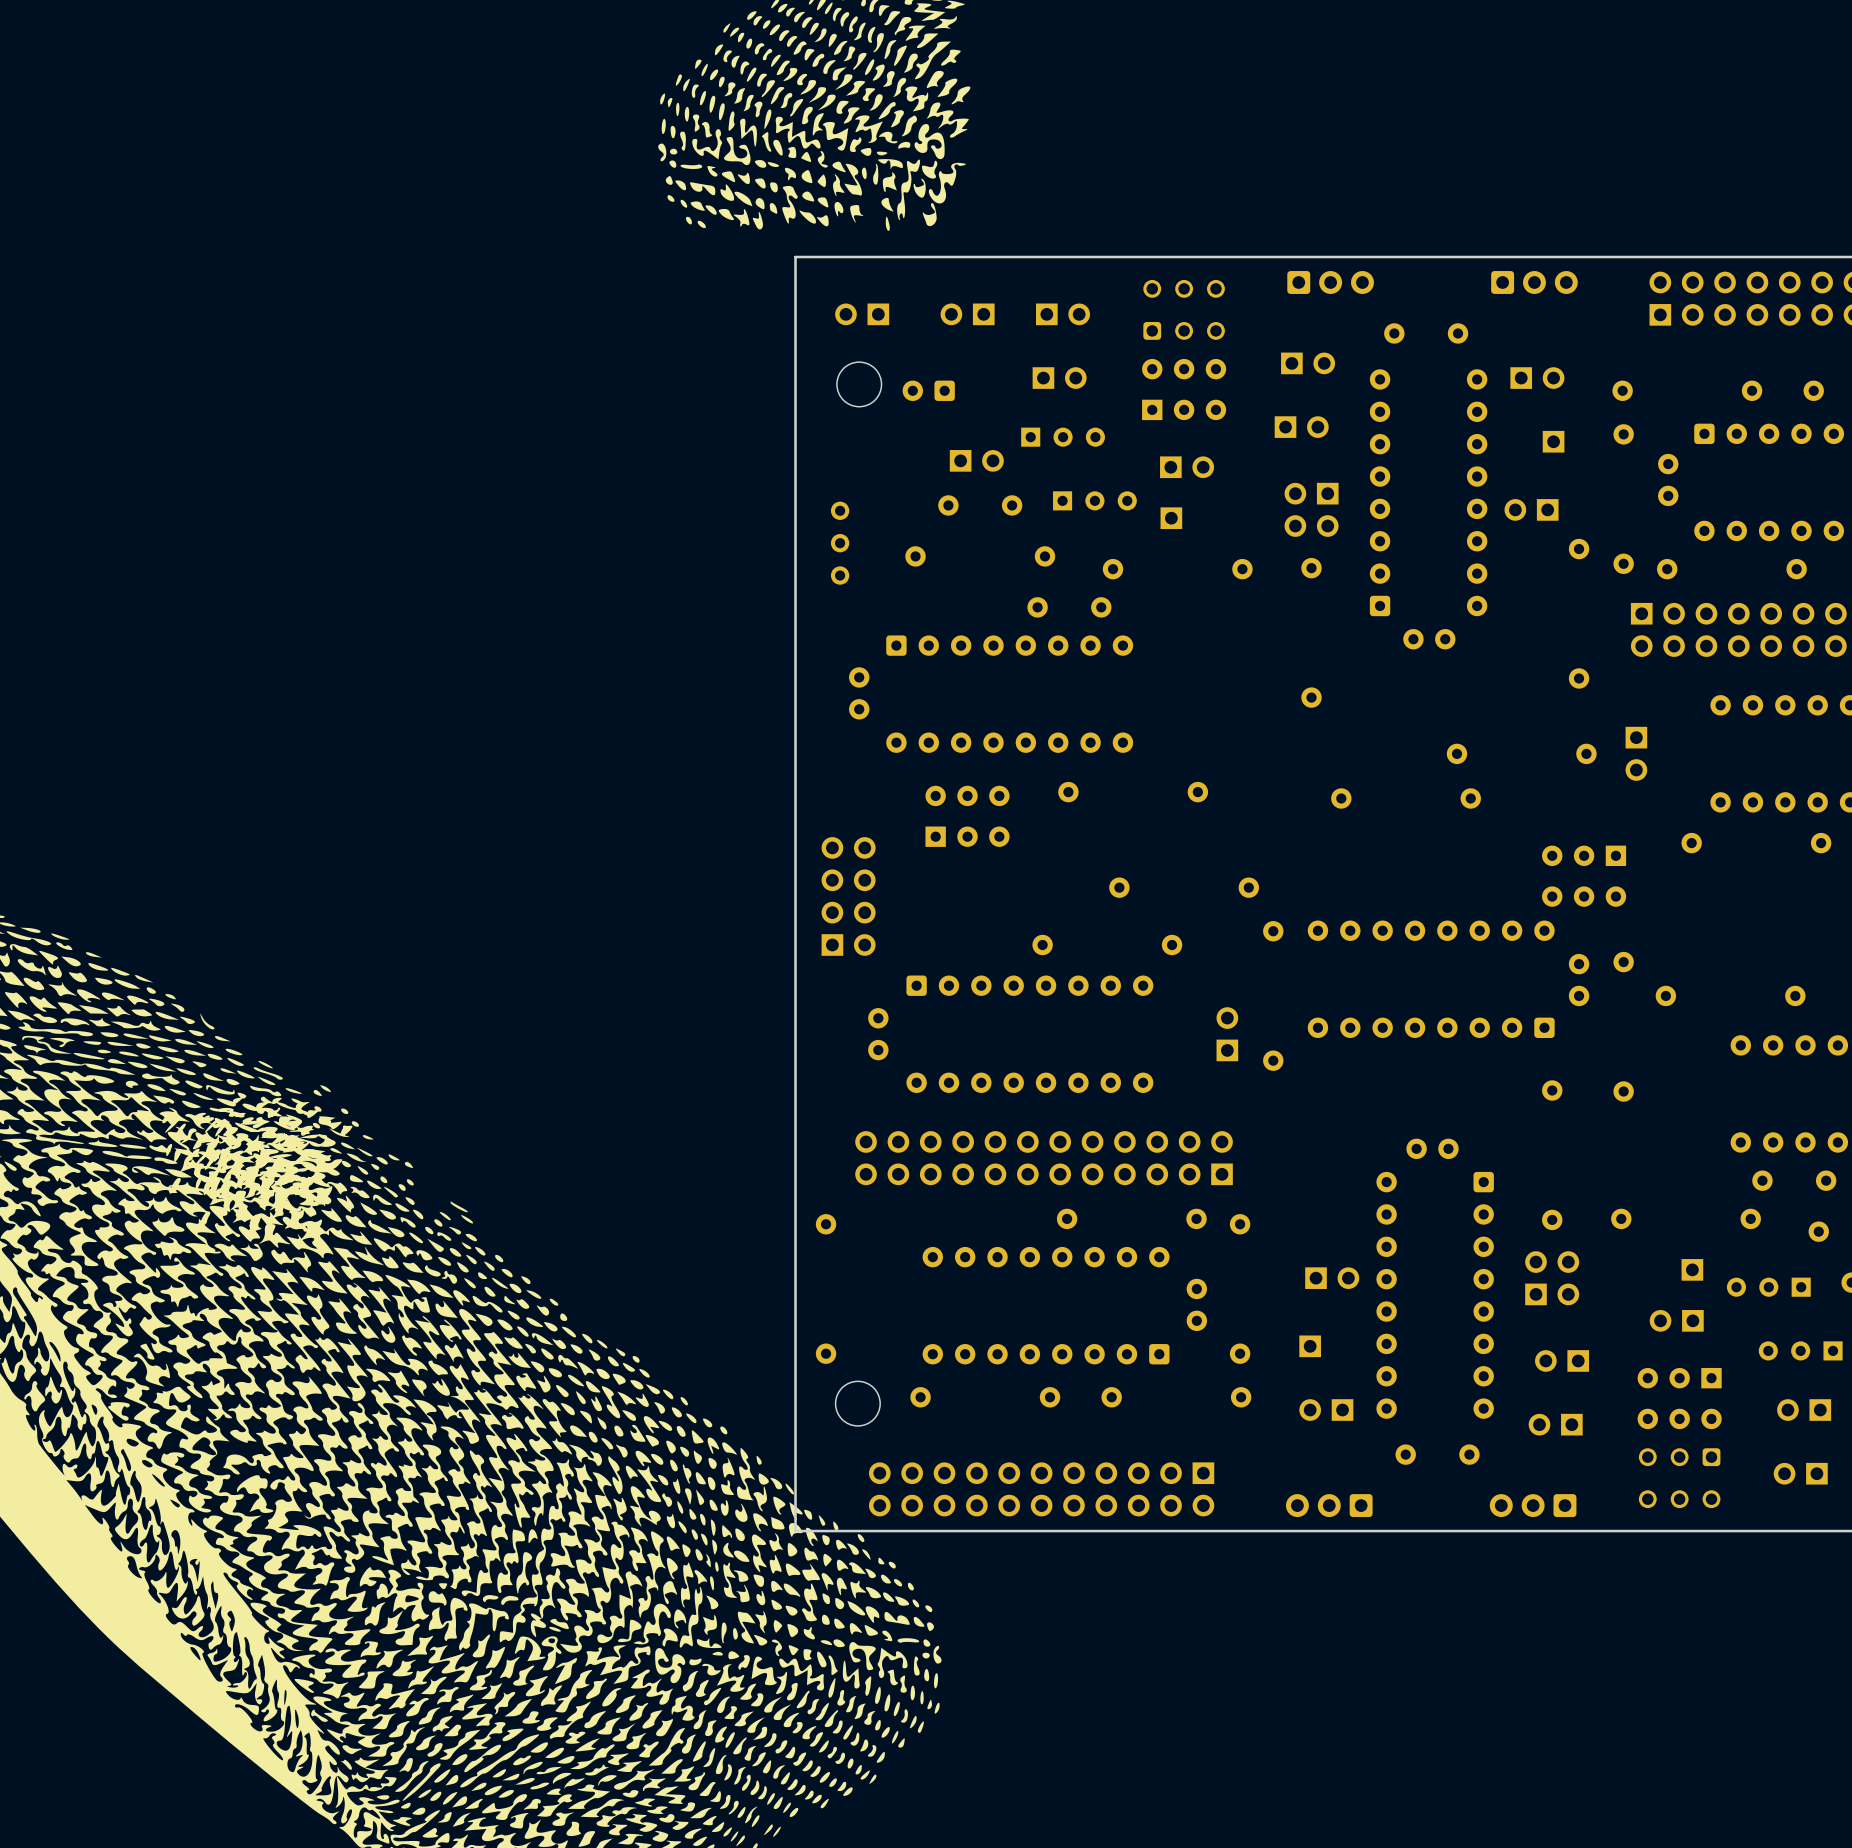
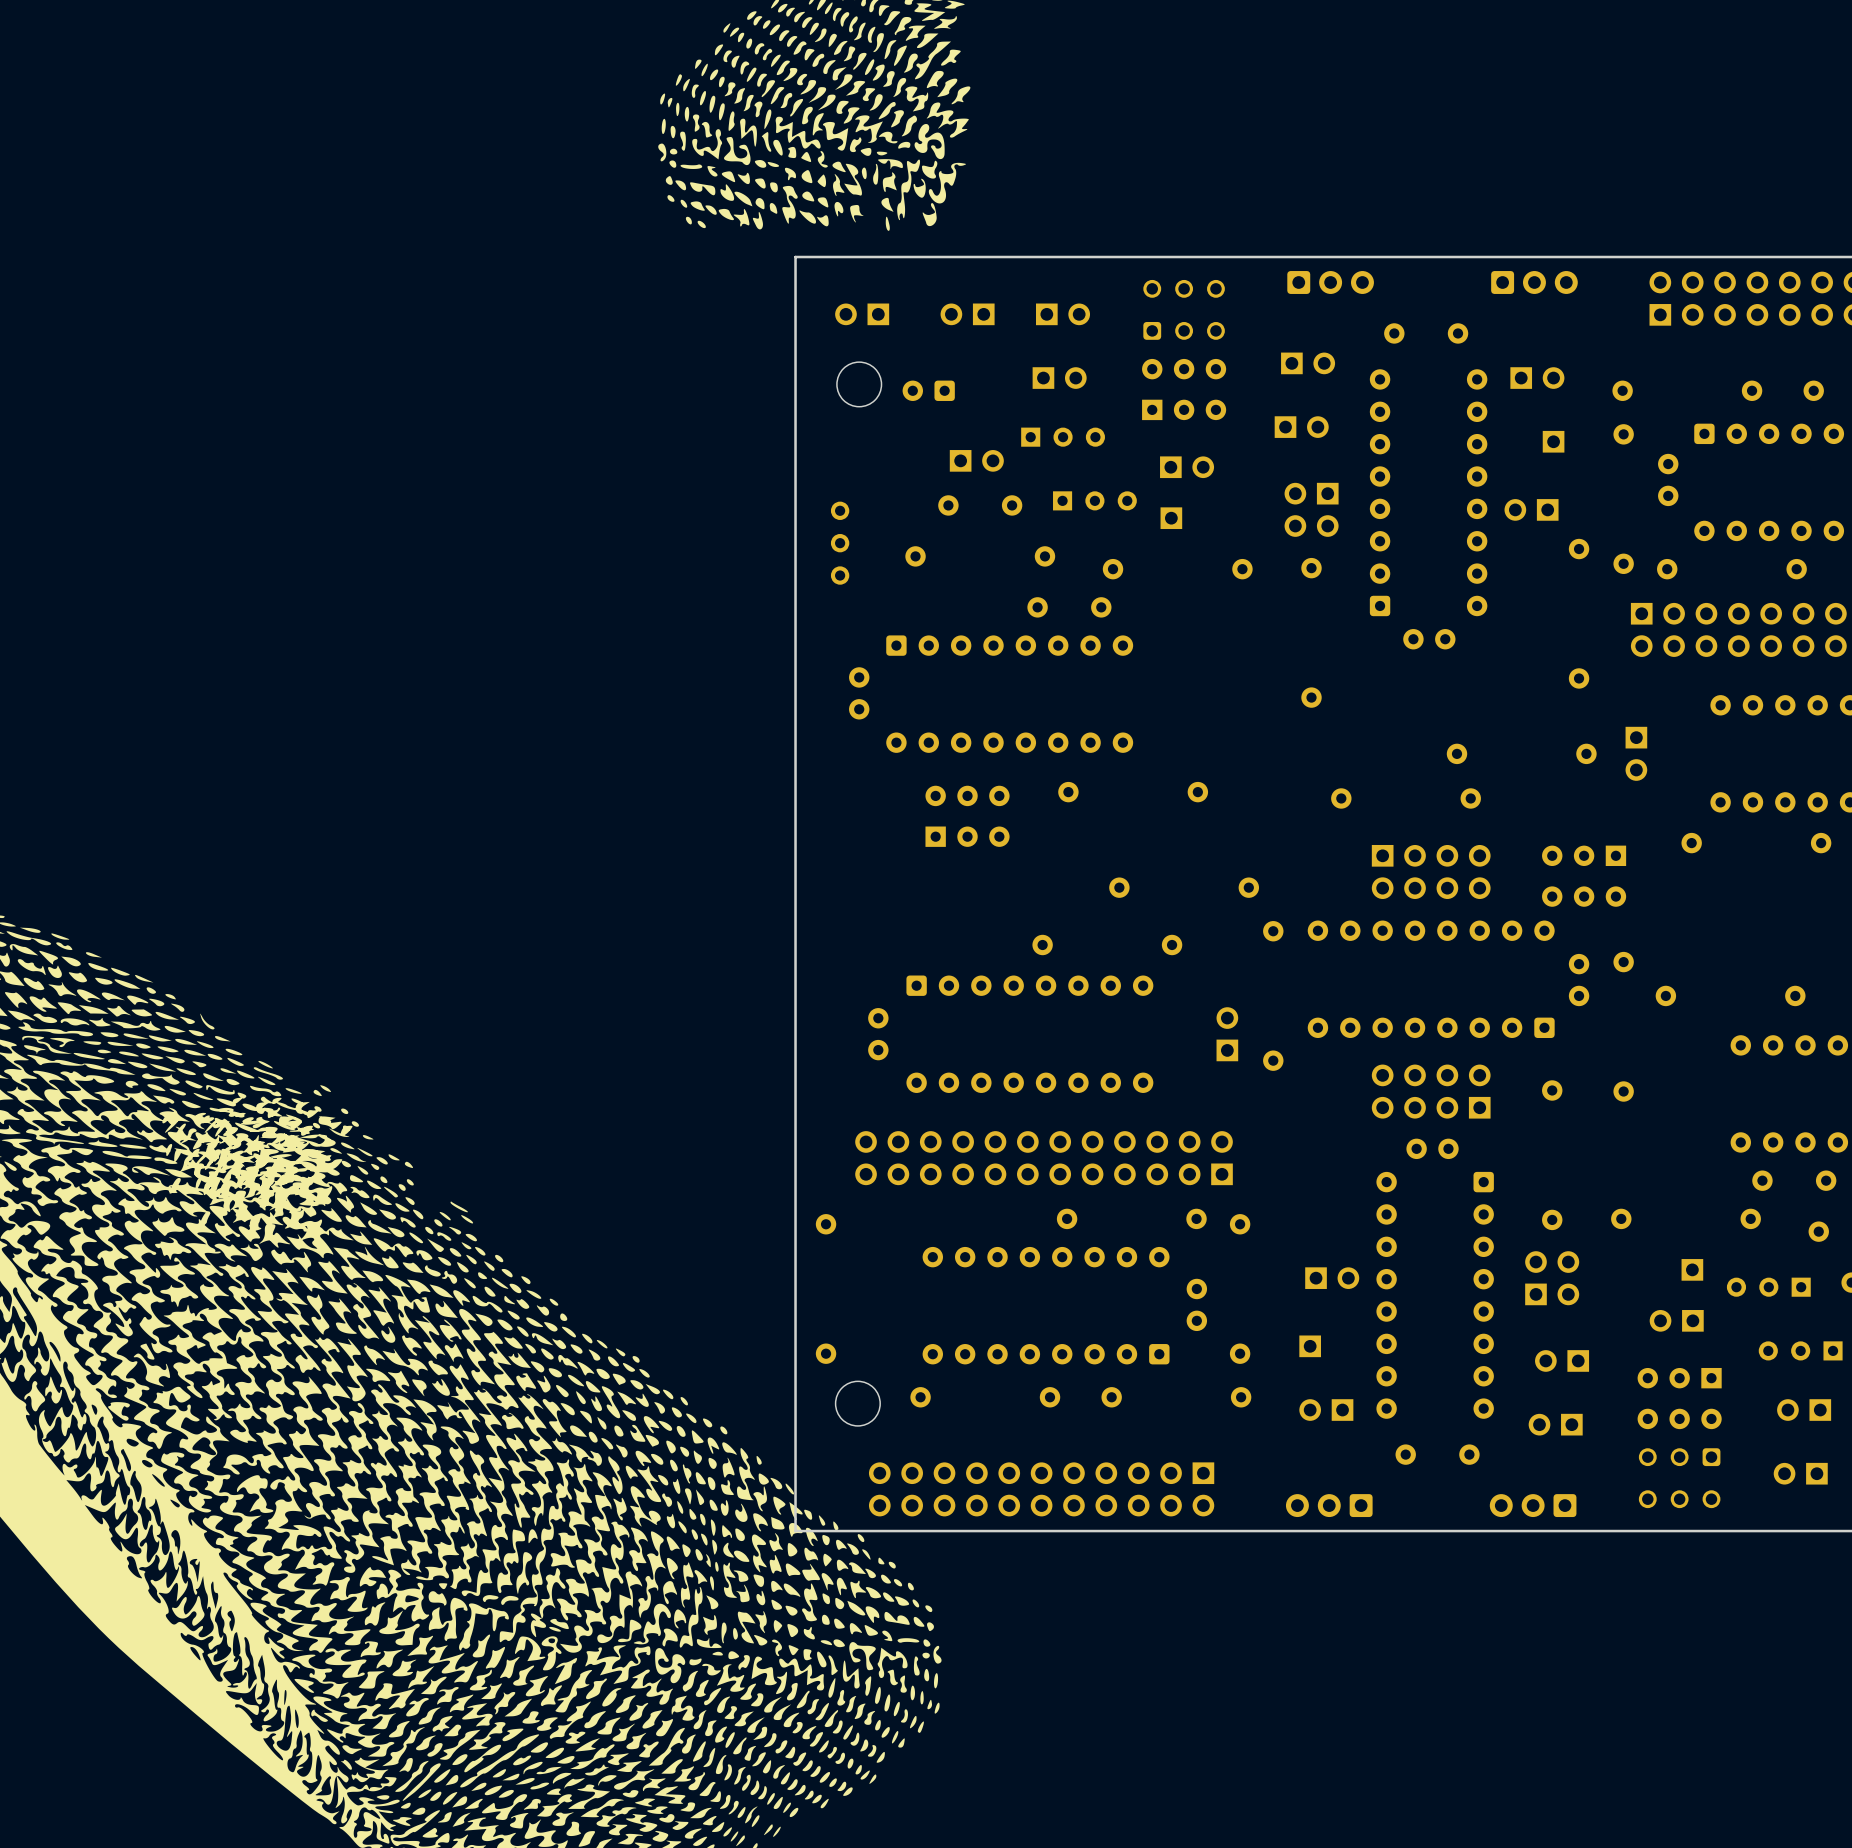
part: none -> (1431, 871)
part: (848, 896) -> none
part: none -> (1431, 1091)

